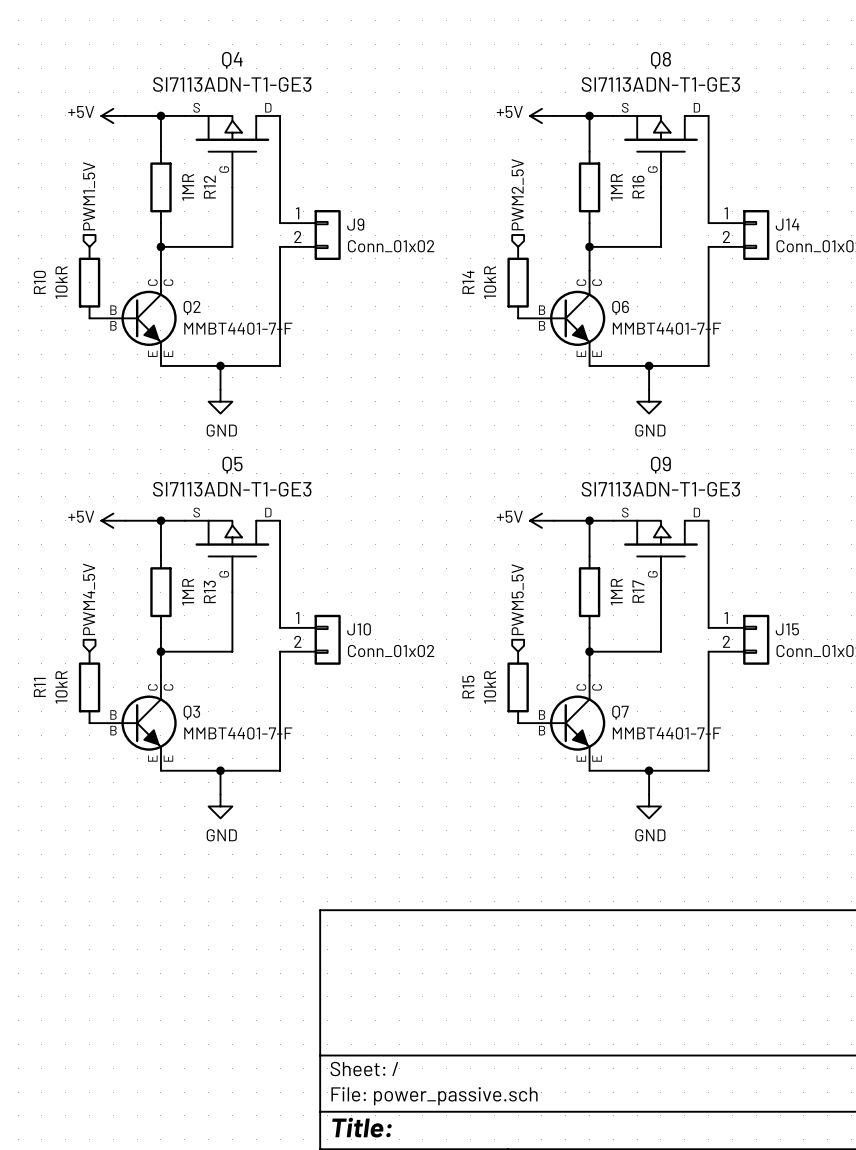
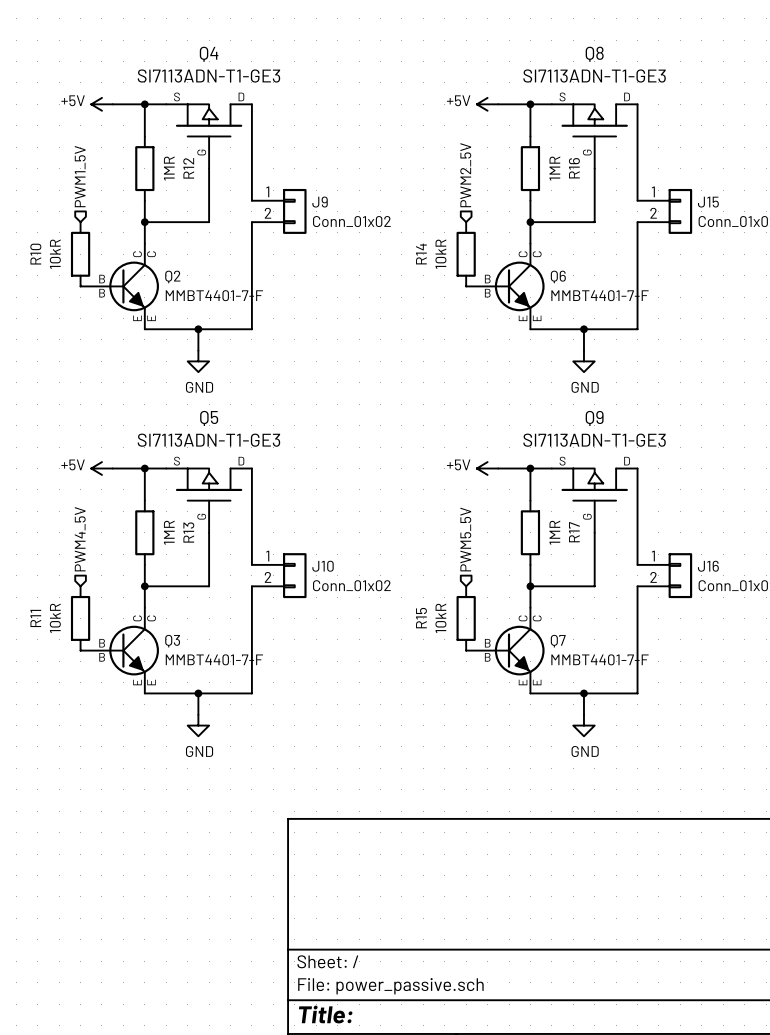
J14 name: J14 (787, 224) -> J15 (708, 202)
J15 name: J15 (787, 629) -> J16 (708, 566)

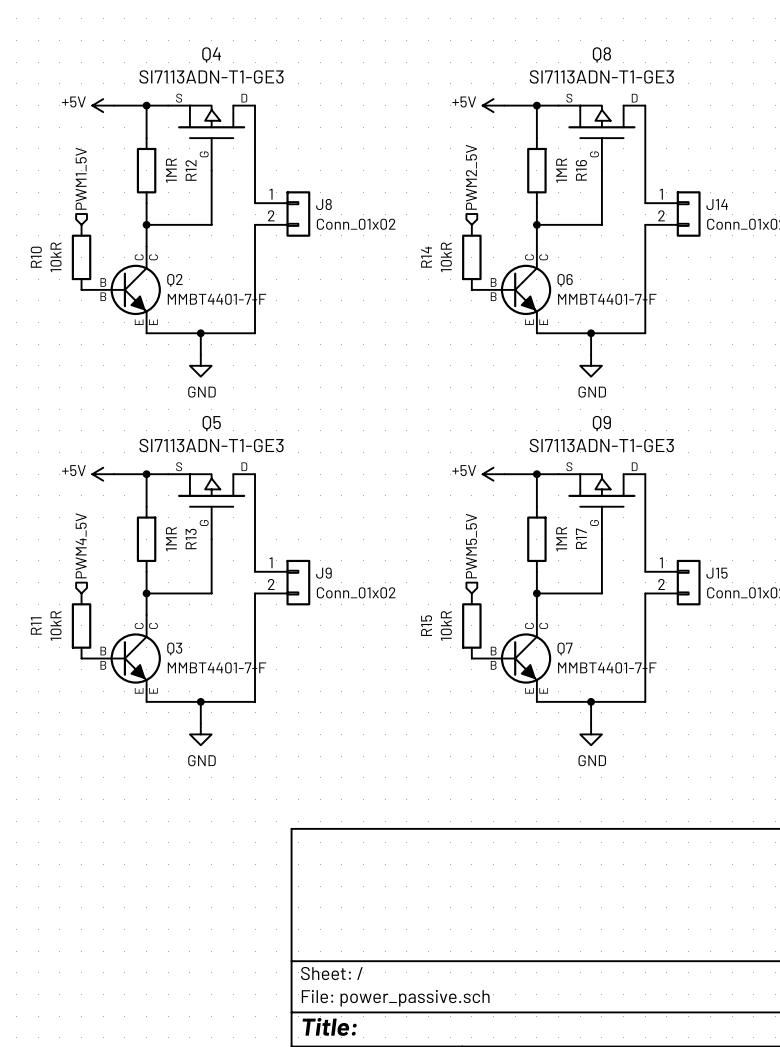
J9 name: J9 (320, 202) -> J8 (323, 204)
J15 name: J15 (708, 202) -> J14 (717, 204)
J10 name: J10 (323, 566) -> J9 (323, 573)
J16 name: J16 (708, 566) -> J15 (717, 573)

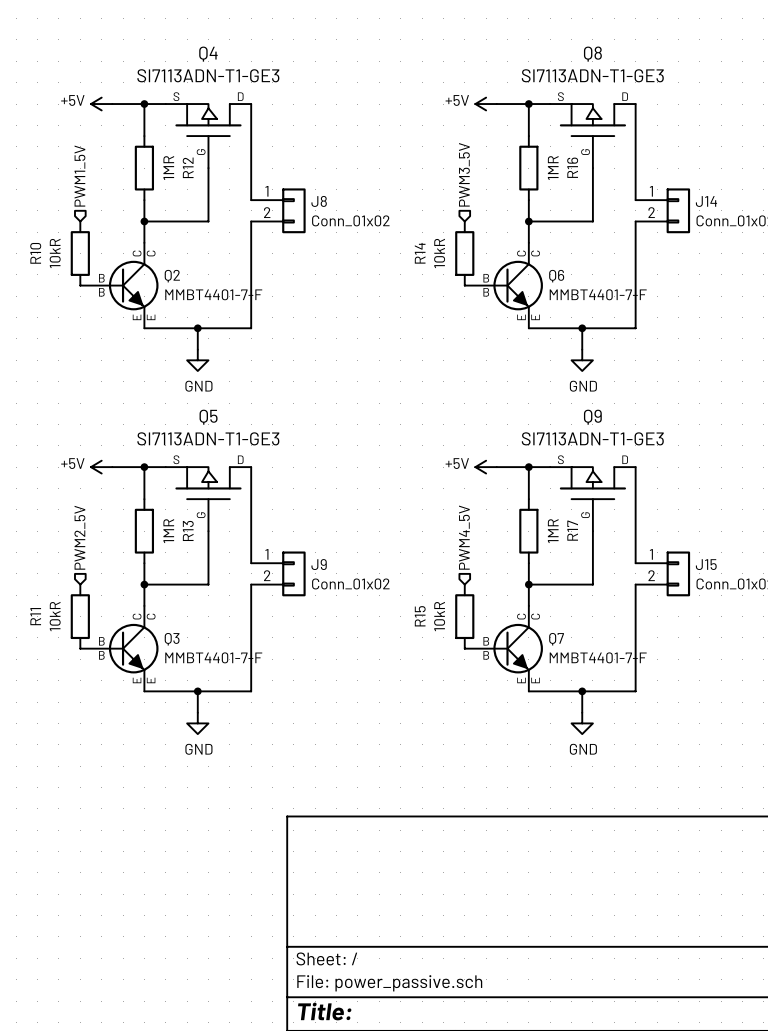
hierarchical label: PWM2_5V (471, 177) -> PWM3_5V (464, 174)
hierarchical label: PWM4_5V (81, 545) -> PWM2_5V (79, 537)
hierarchical label: PWM5_5V (471, 546) -> PWM4_5V (464, 537)

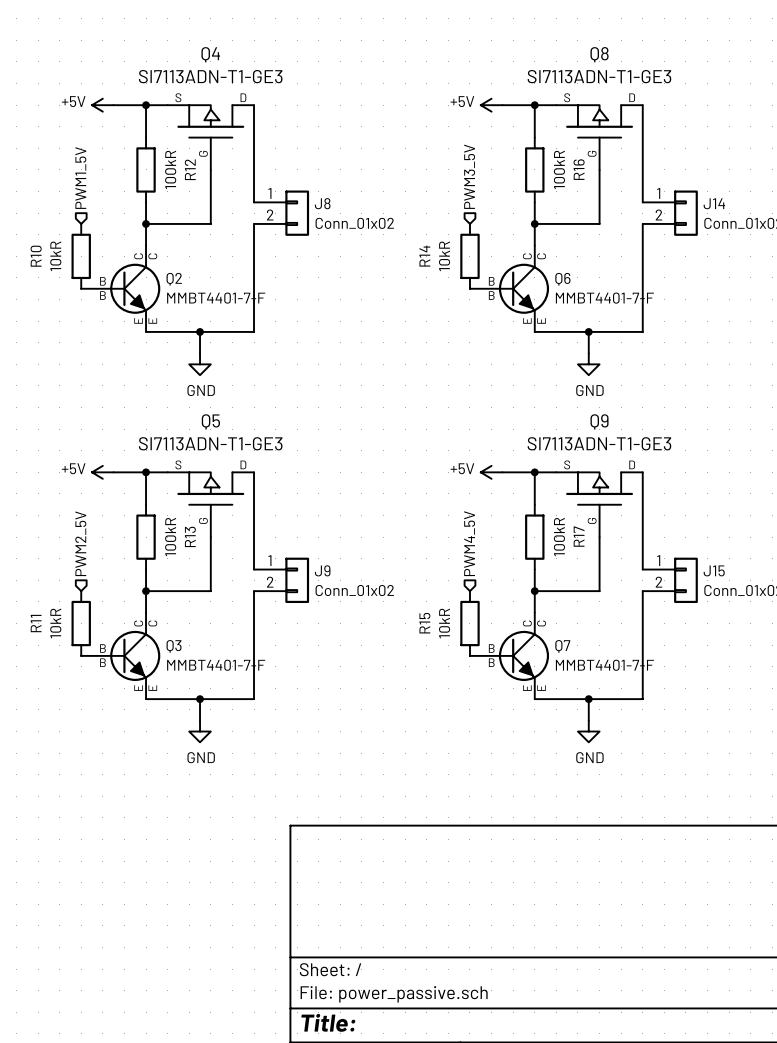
R12 value: 1MR (168, 168) -> 100kR (170, 169)
R16 value: 1MR (553, 168) -> 100kR (559, 169)
R13 value: 1MR (168, 531) -> 100kR (170, 537)
R17 value: 1MR (553, 531) -> 100kR (559, 537)

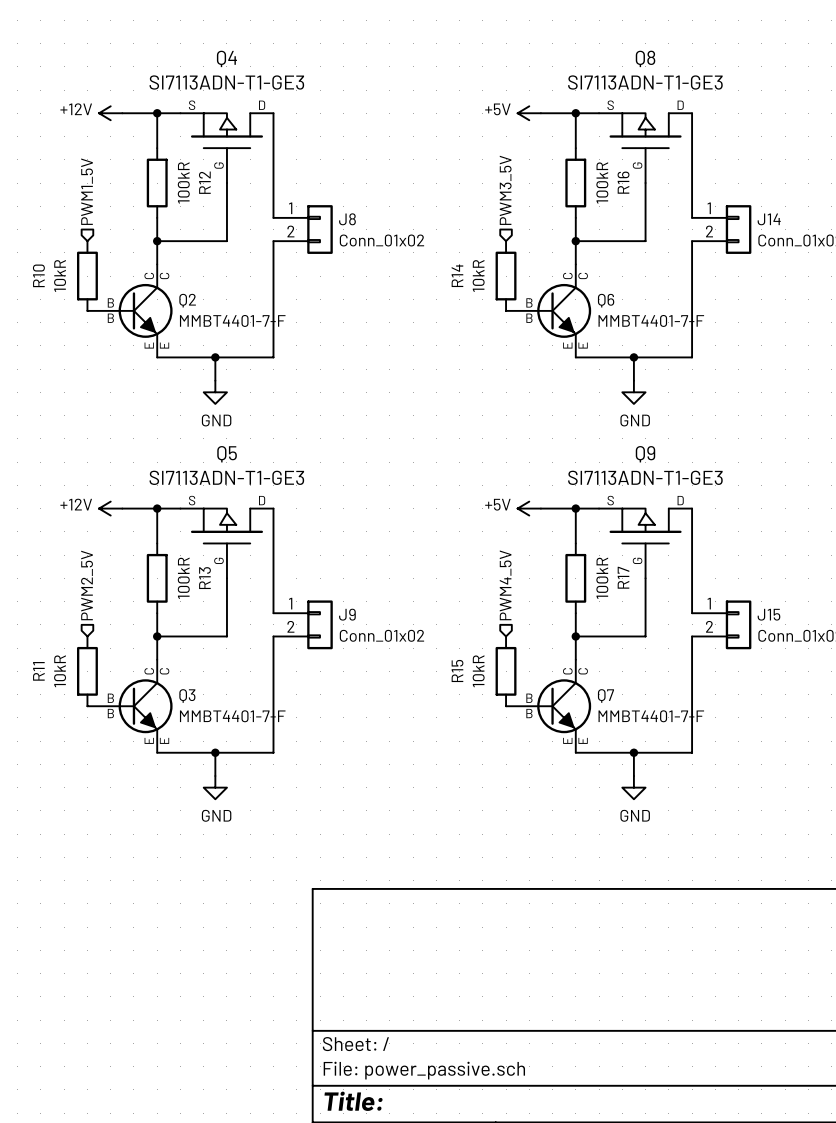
power symbol: +5V (102, 105) -> +12V (110, 113)
power symbol: +5V (102, 472) -> +12V (110, 508)

